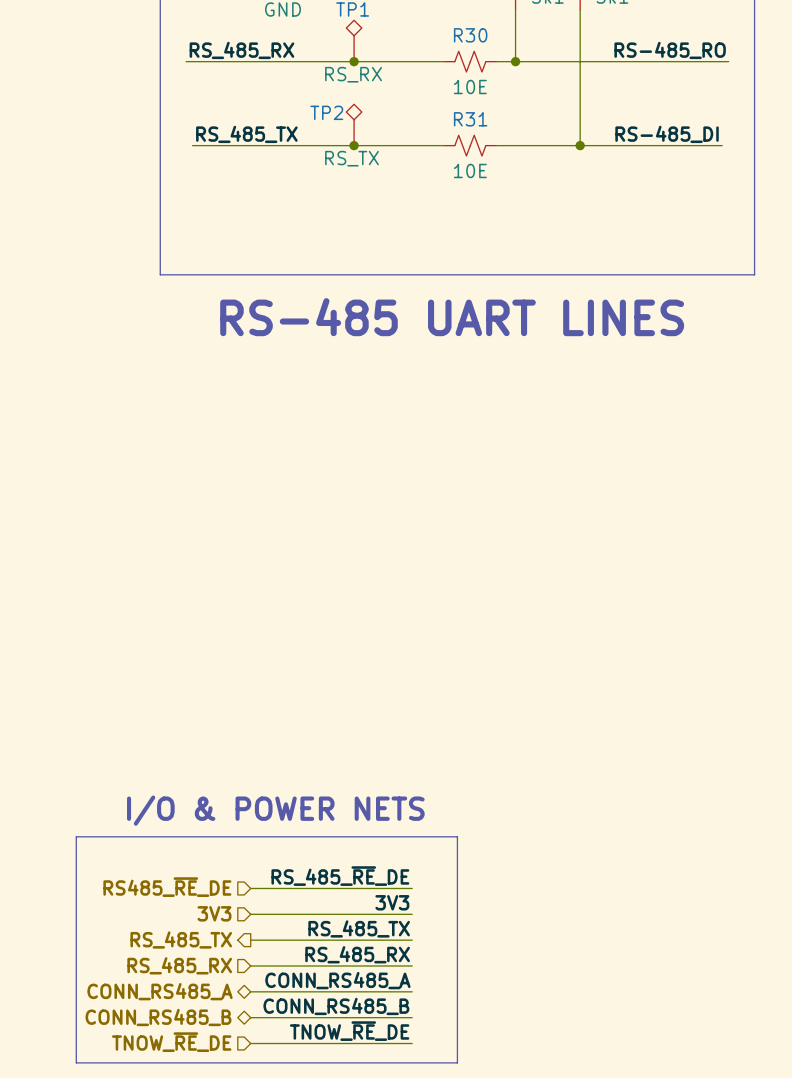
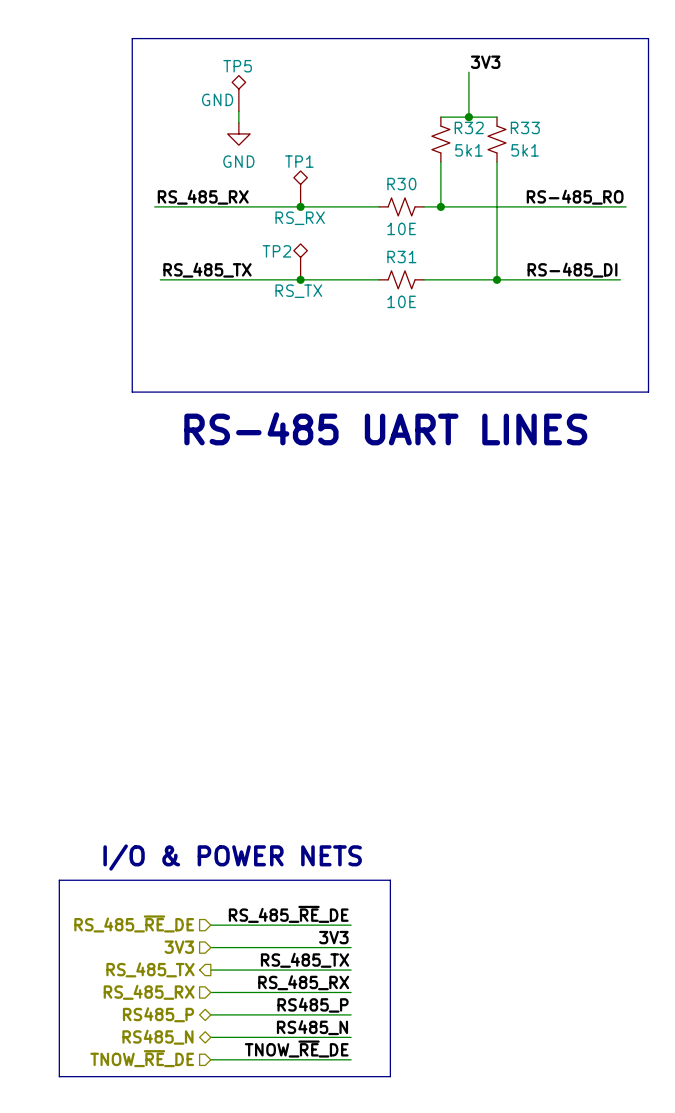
hierarchical label: RS485_~{RE}_DE (167, 887) -> RS_485_~{RE}_DE (134, 923)
label: CONN_RS485_A (337, 980) -> RS485_P (313, 1005)
hierarchical label: CONN_RS485_A (160, 991) -> RS485_P (158, 1014)
label: CONN_RS485_B (336, 1006) -> RS485_N (312, 1027)
hierarchical label: CONN_RS485_B (158, 1017) -> RS485_N (157, 1037)

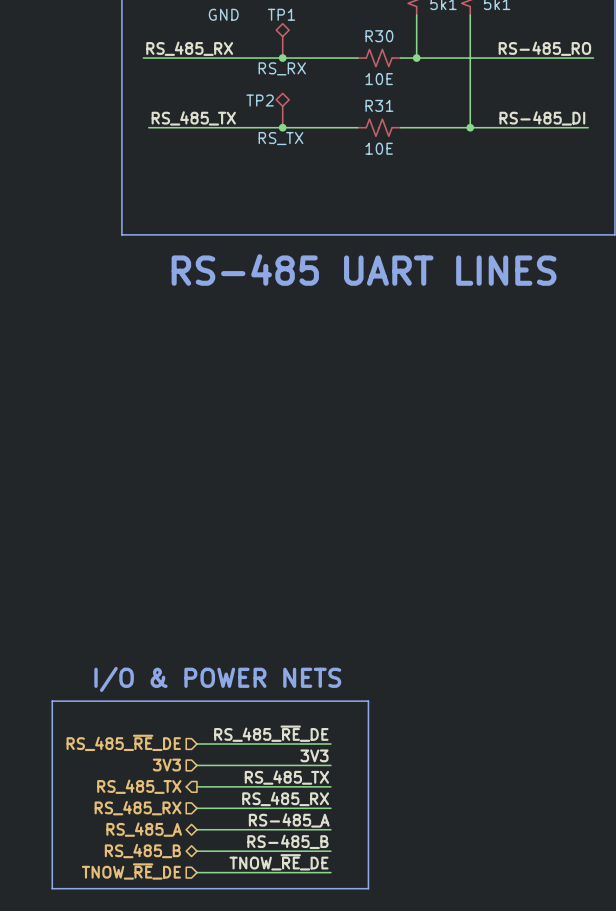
label: RS485_P (313, 1005) -> RS-485_A (289, 820)
hierarchical label: RS485_P (158, 1014) -> RS_485_A (144, 829)
label: RS485_N (312, 1027) -> RS-485_B (287, 841)
hierarchical label: RS485_N (157, 1037) -> RS_485_B (142, 851)

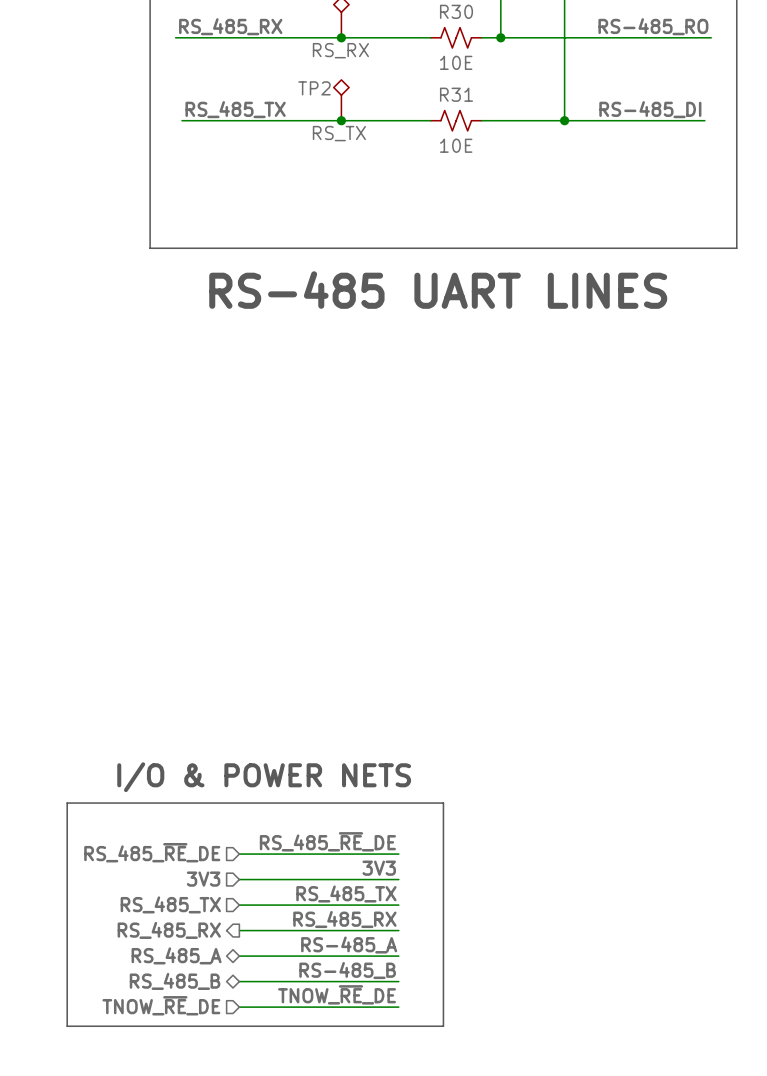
hierarchical label shape: output (139, 786) -> input (170, 904)
hierarchical label shape: input (138, 808) -> output (169, 930)

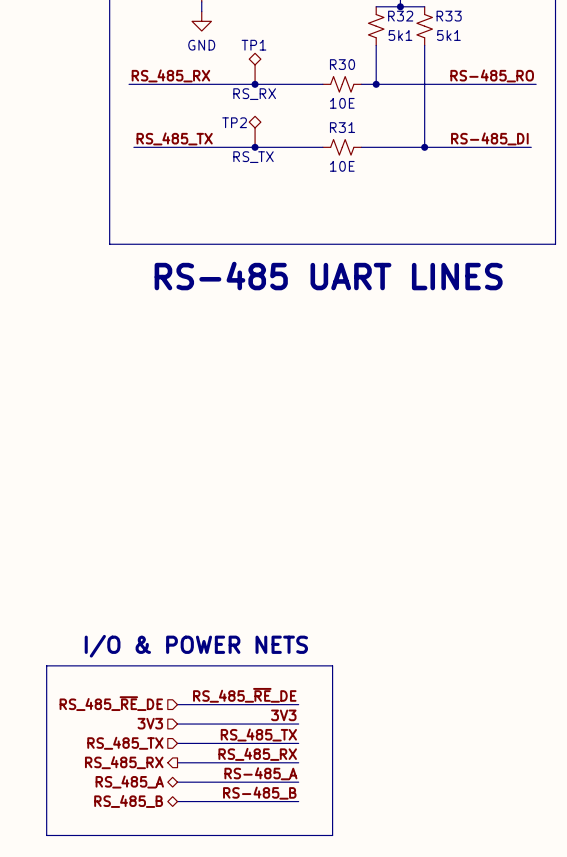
label: TNOW_~{RE}_DE (336, 994) -> none
hierarchical label: TNOW_~{RE}_DE (161, 1005) -> none
wire: (239, 1007) (398, 1007) -> none

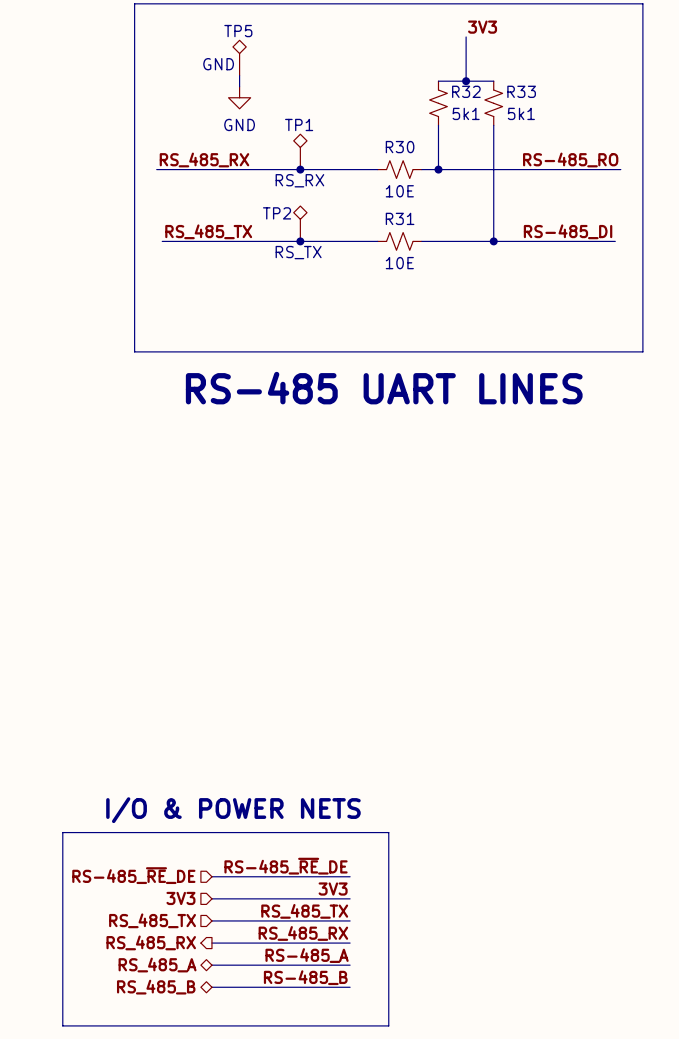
label: RS_485_~{RE}_DE (244, 695) -> RS-485_~{RE}_DE (286, 866)
hierarchical label: RS_485_~{RE}_DE (111, 703) -> RS-485_~{RE}_DE (133, 875)

